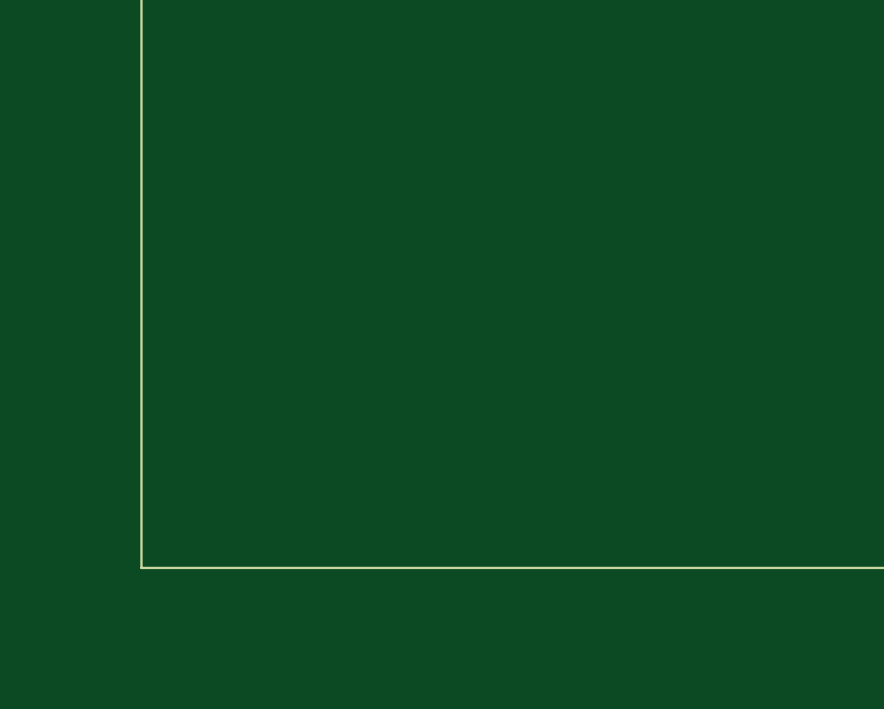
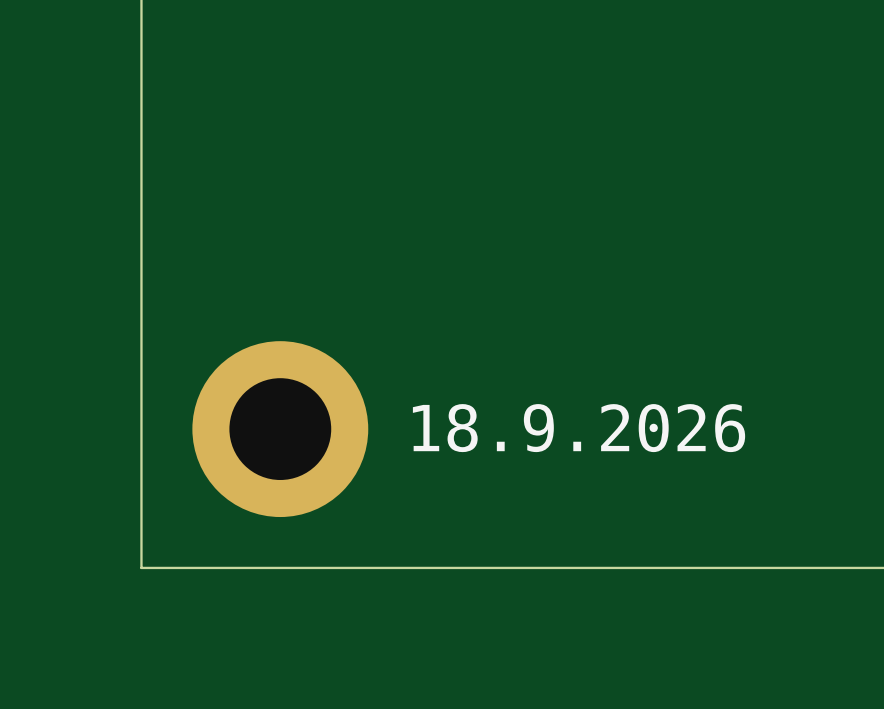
text: none -> 18.9.2026 (579, 428)
part: none -> (280, 429)

